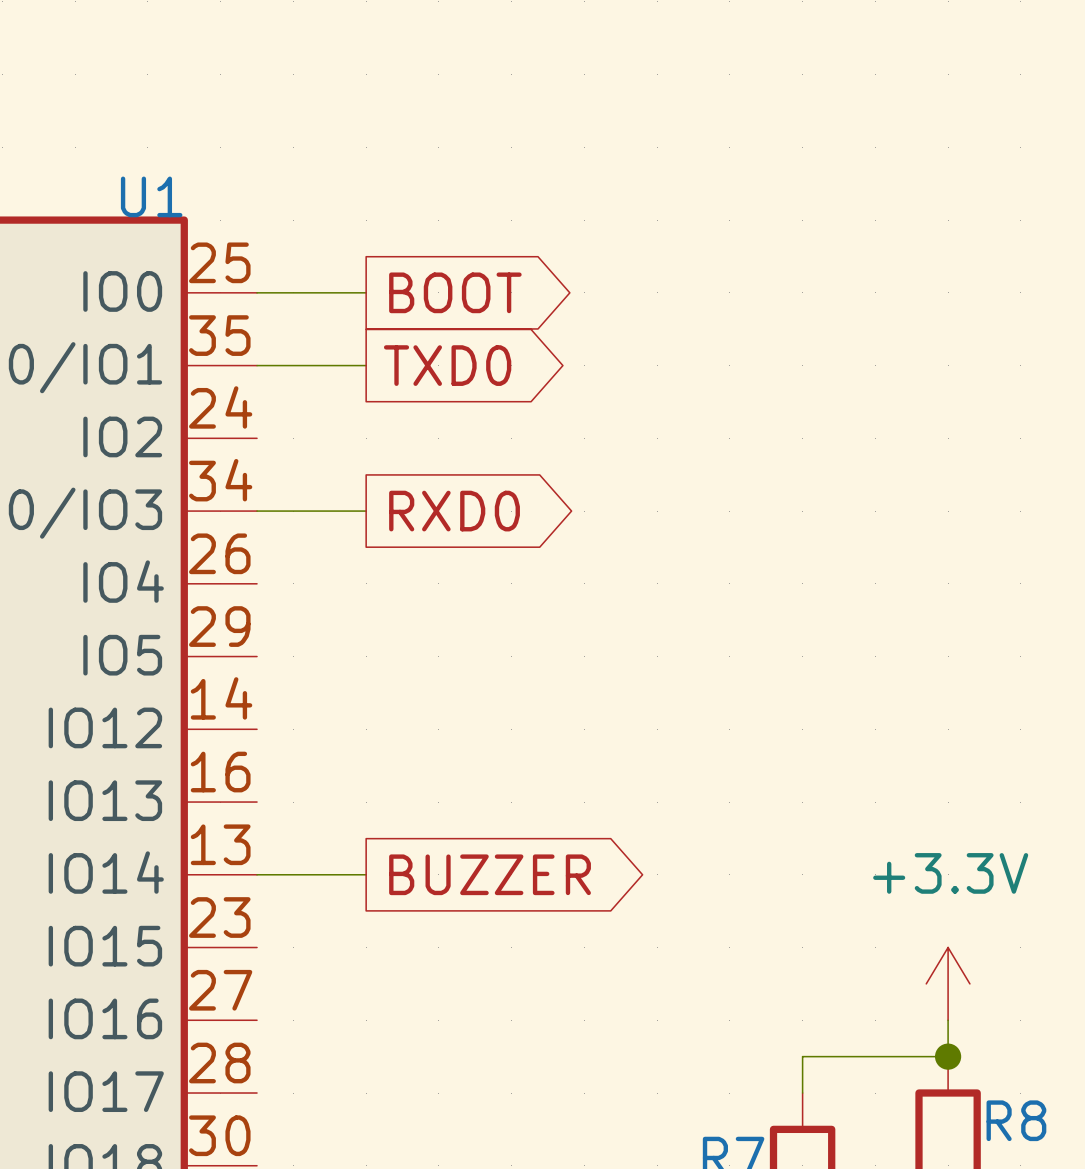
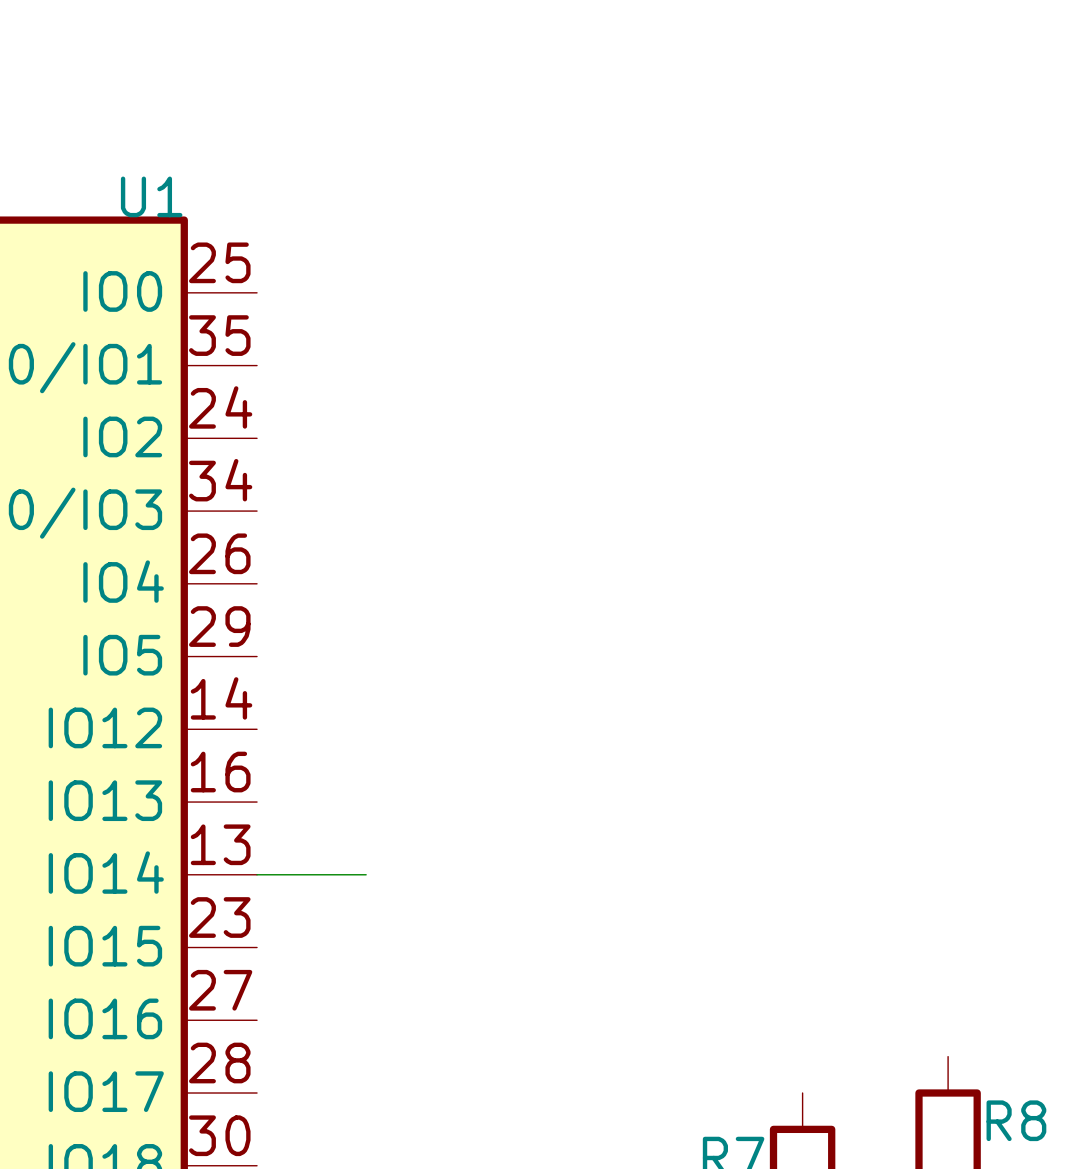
wire: (257, 292) (366, 292) -> none
global label: BOOT (455, 292) -> none
wire: (257, 365) (366, 365) -> none
global label: TXD0 (447, 365) -> none
wire: (257, 511) (366, 511) -> none
global label: RXD0 (454, 511) -> none
global label: BUZZER (490, 874) -> none
power symbol: +3.3V (948, 983) -> none
wire: (948, 1020) (948, 1056) (802, 1056) (802, 1093) -> none
junction: (948, 1056) -> none

